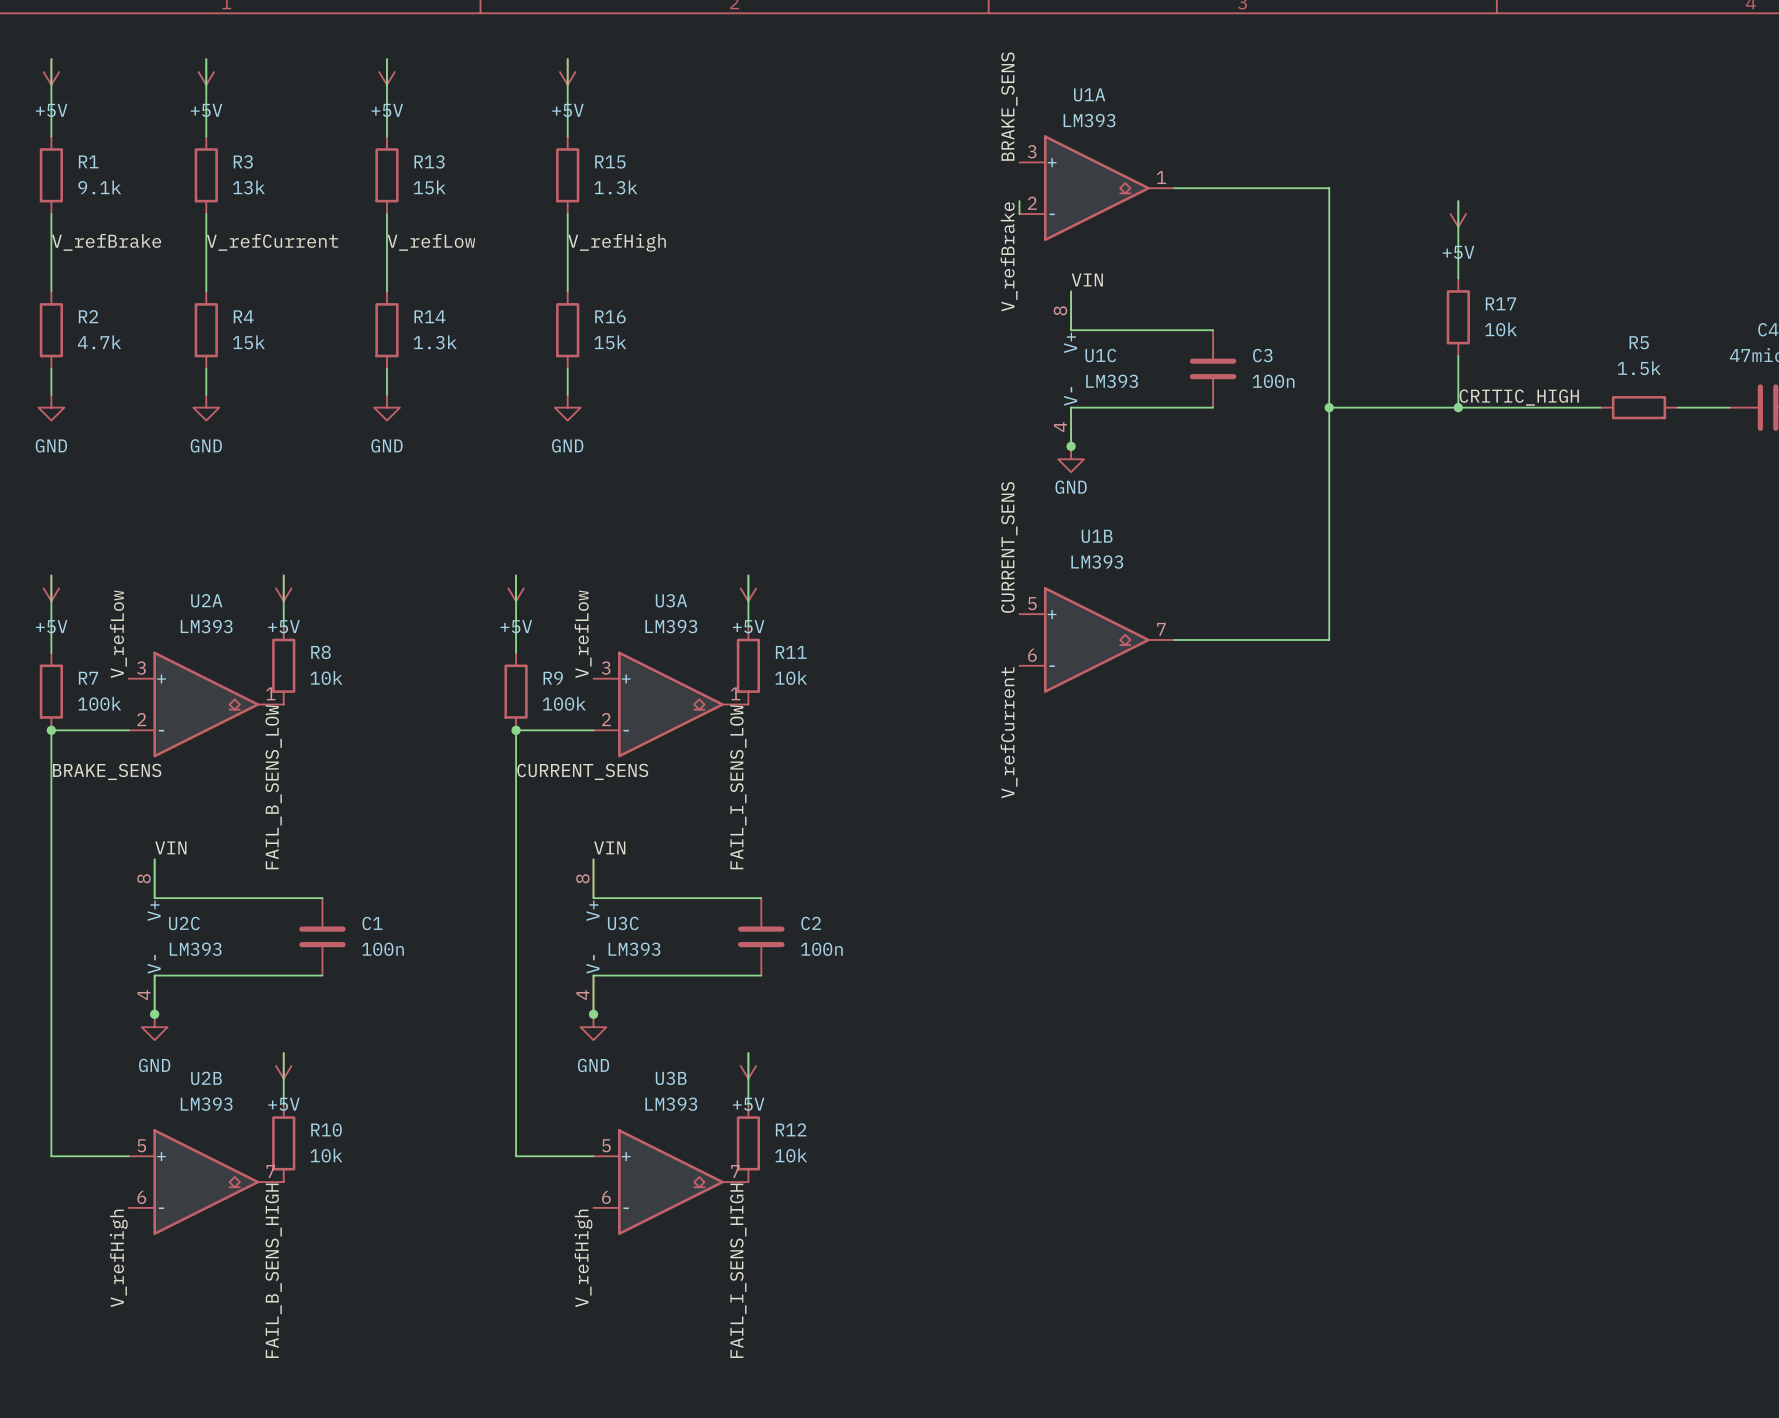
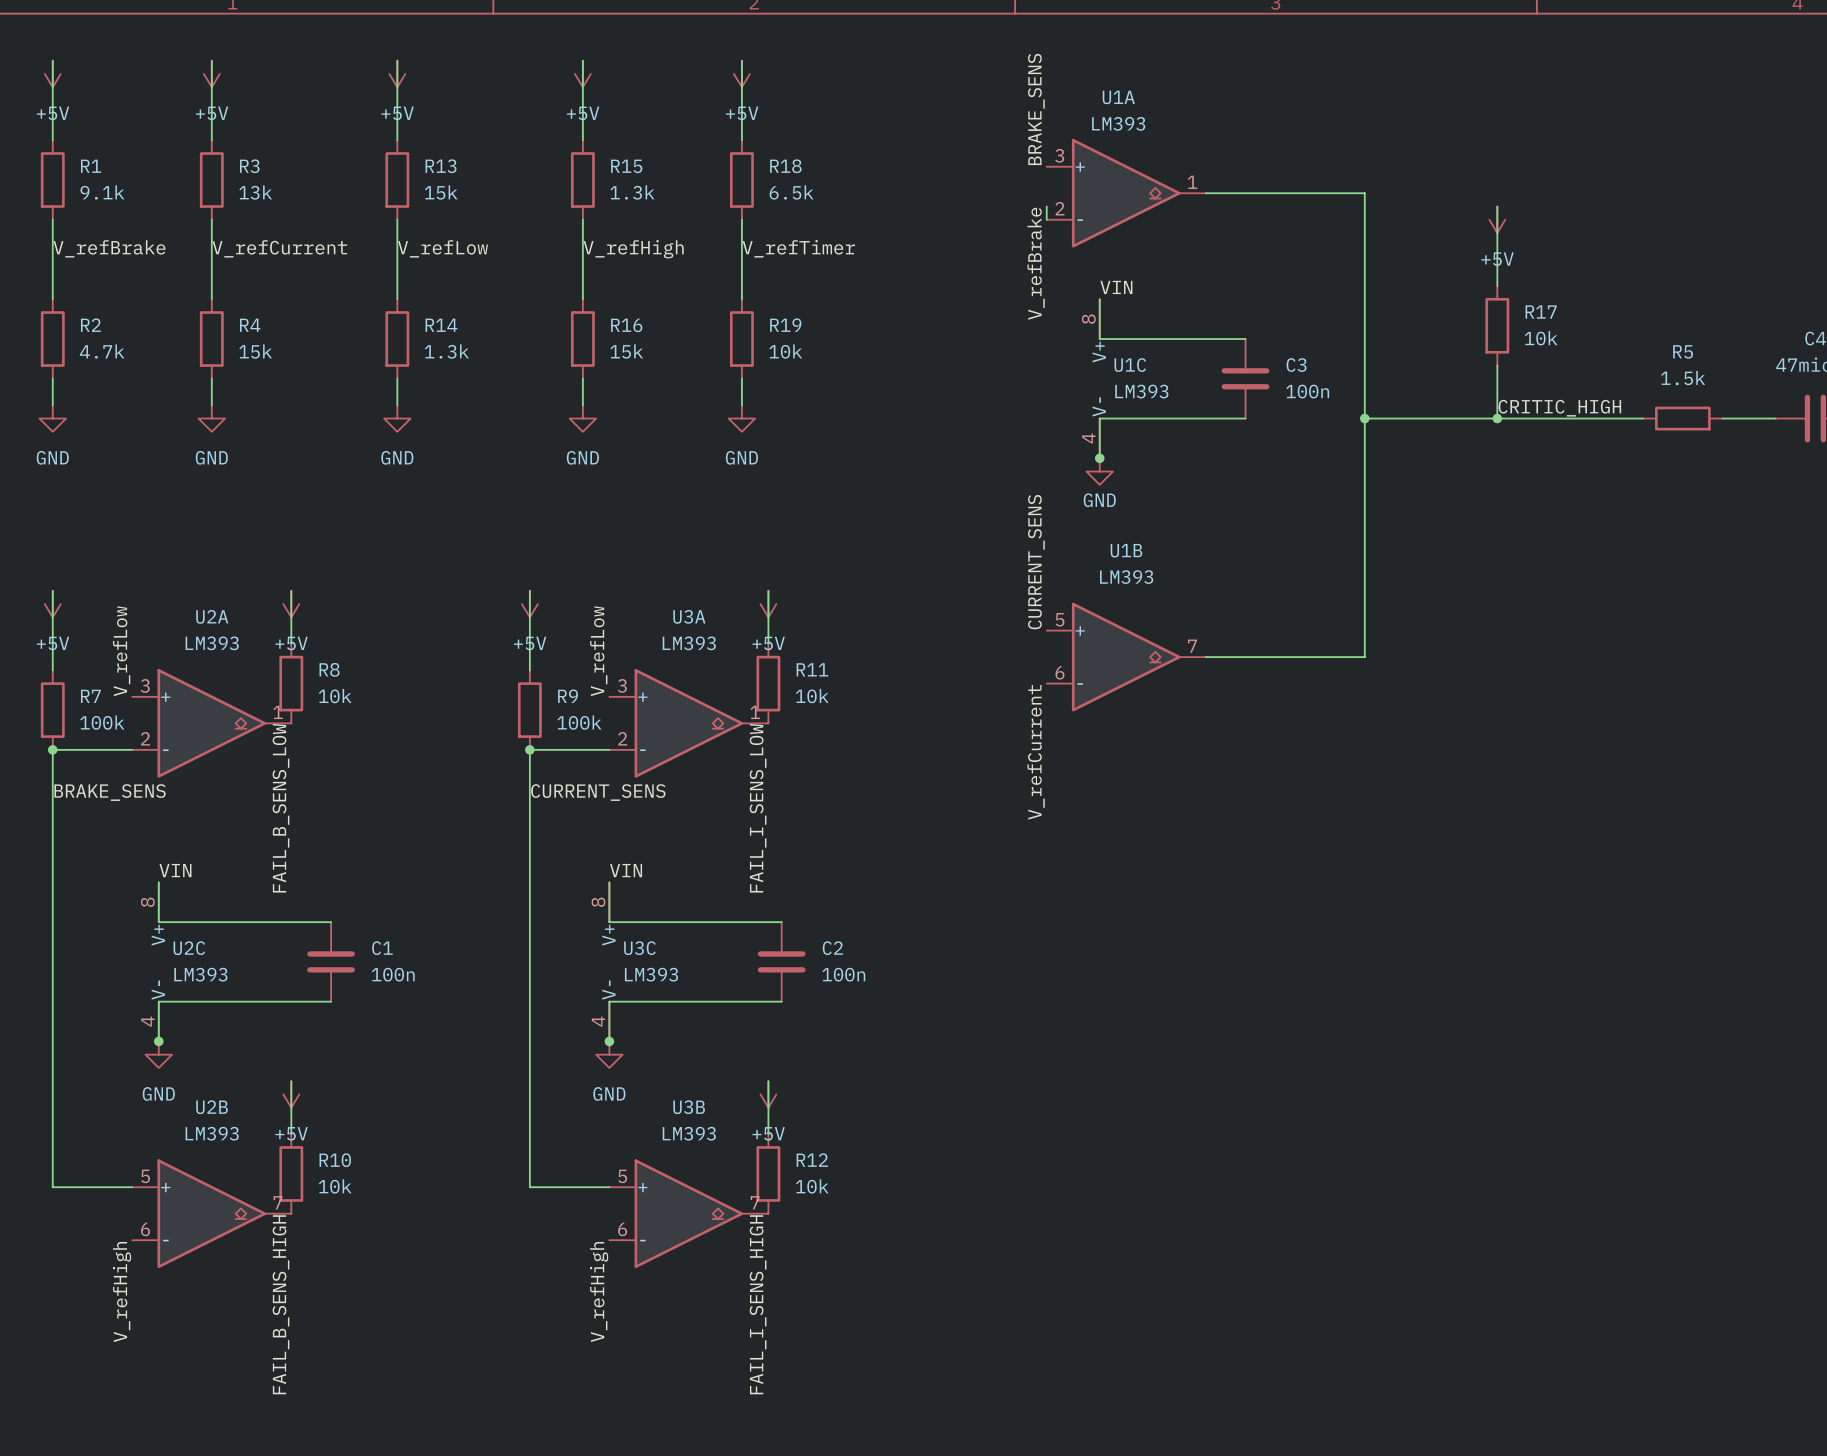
wire: none -> (741, 60) (741, 140)
power symbol: none -> +5V (741, 73)
R18: none -> 6.5k (741, 180)
wire: none -> (741, 219) (741, 299)
label: none -> V_refTimer (798, 248)
R19: none -> 10k (741, 339)
wire: none -> (741, 378) (741, 405)
power symbol: none -> GND (741, 418)

